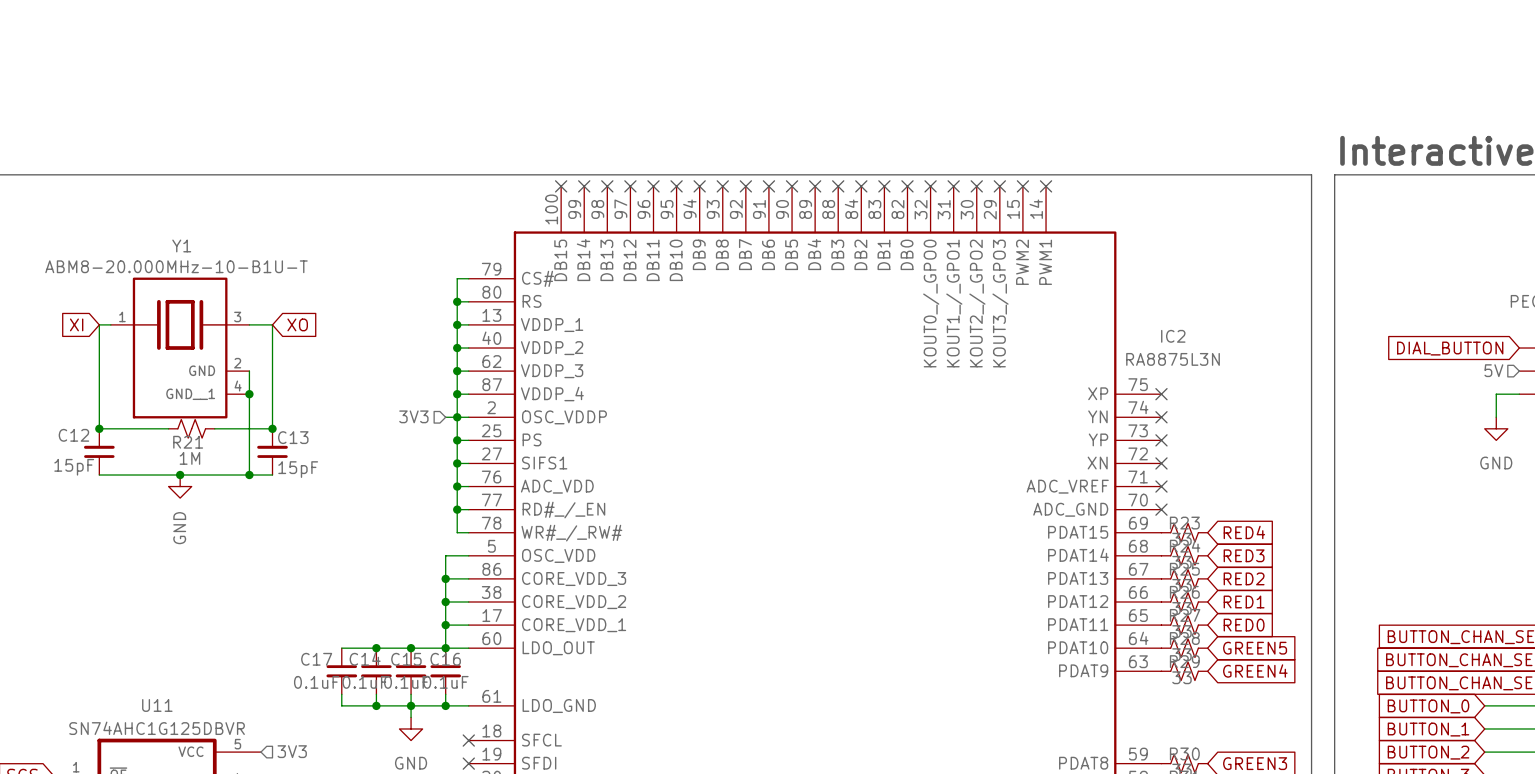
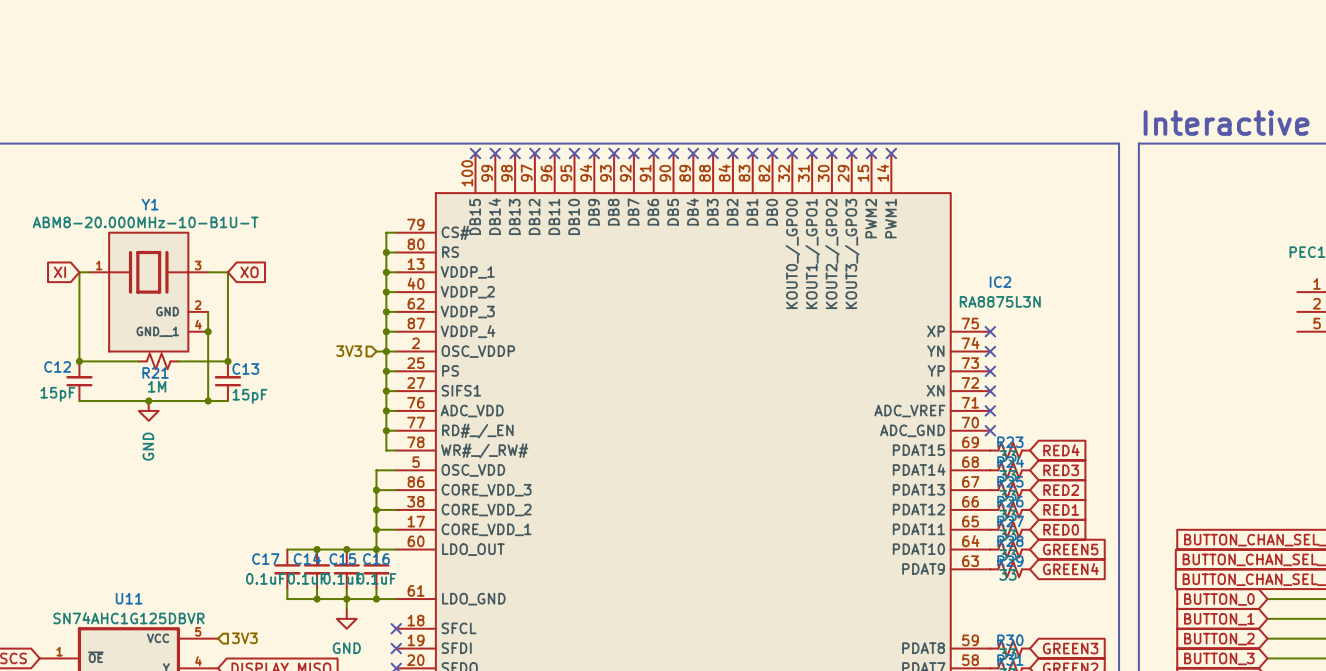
global label: DIAL_BUTTON (1450, 348) -> none
hierarchical label: 5V (1493, 370) -> none
wire: (1519, 394) (1496, 394) (1496, 417) -> none
power symbol: GND (1496, 428) -> none

